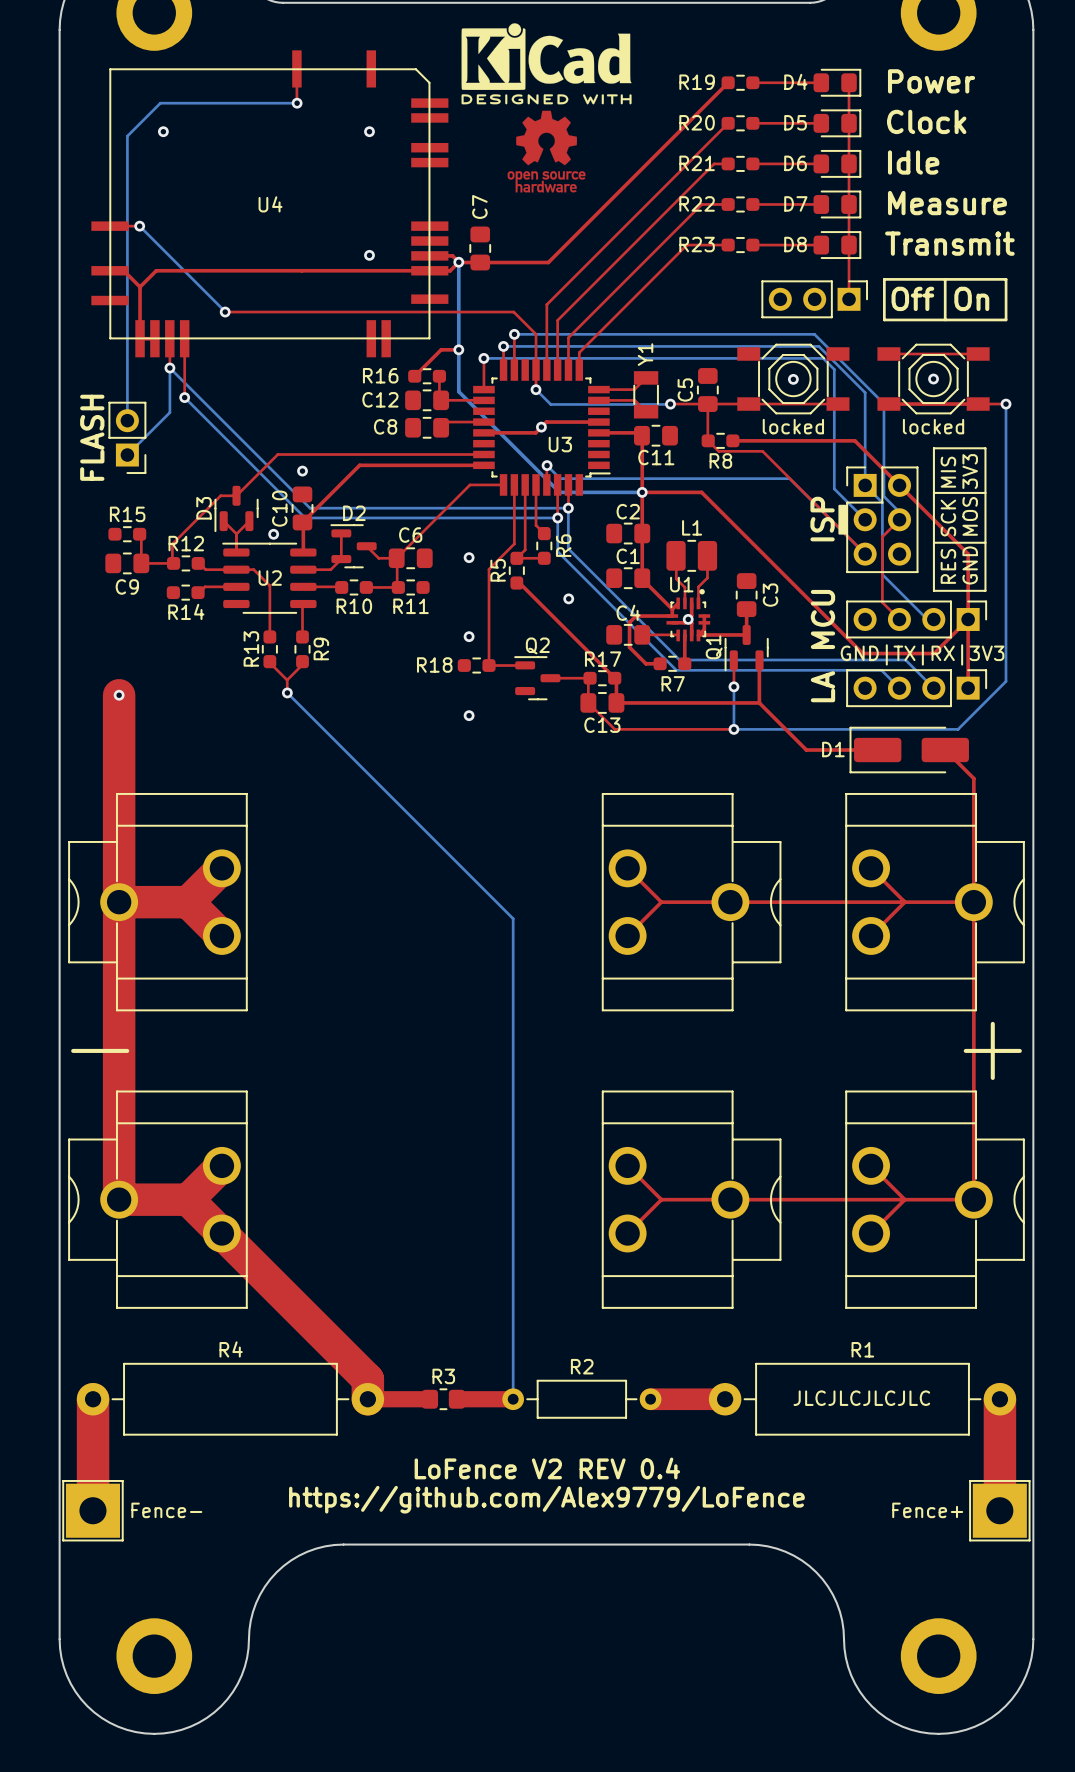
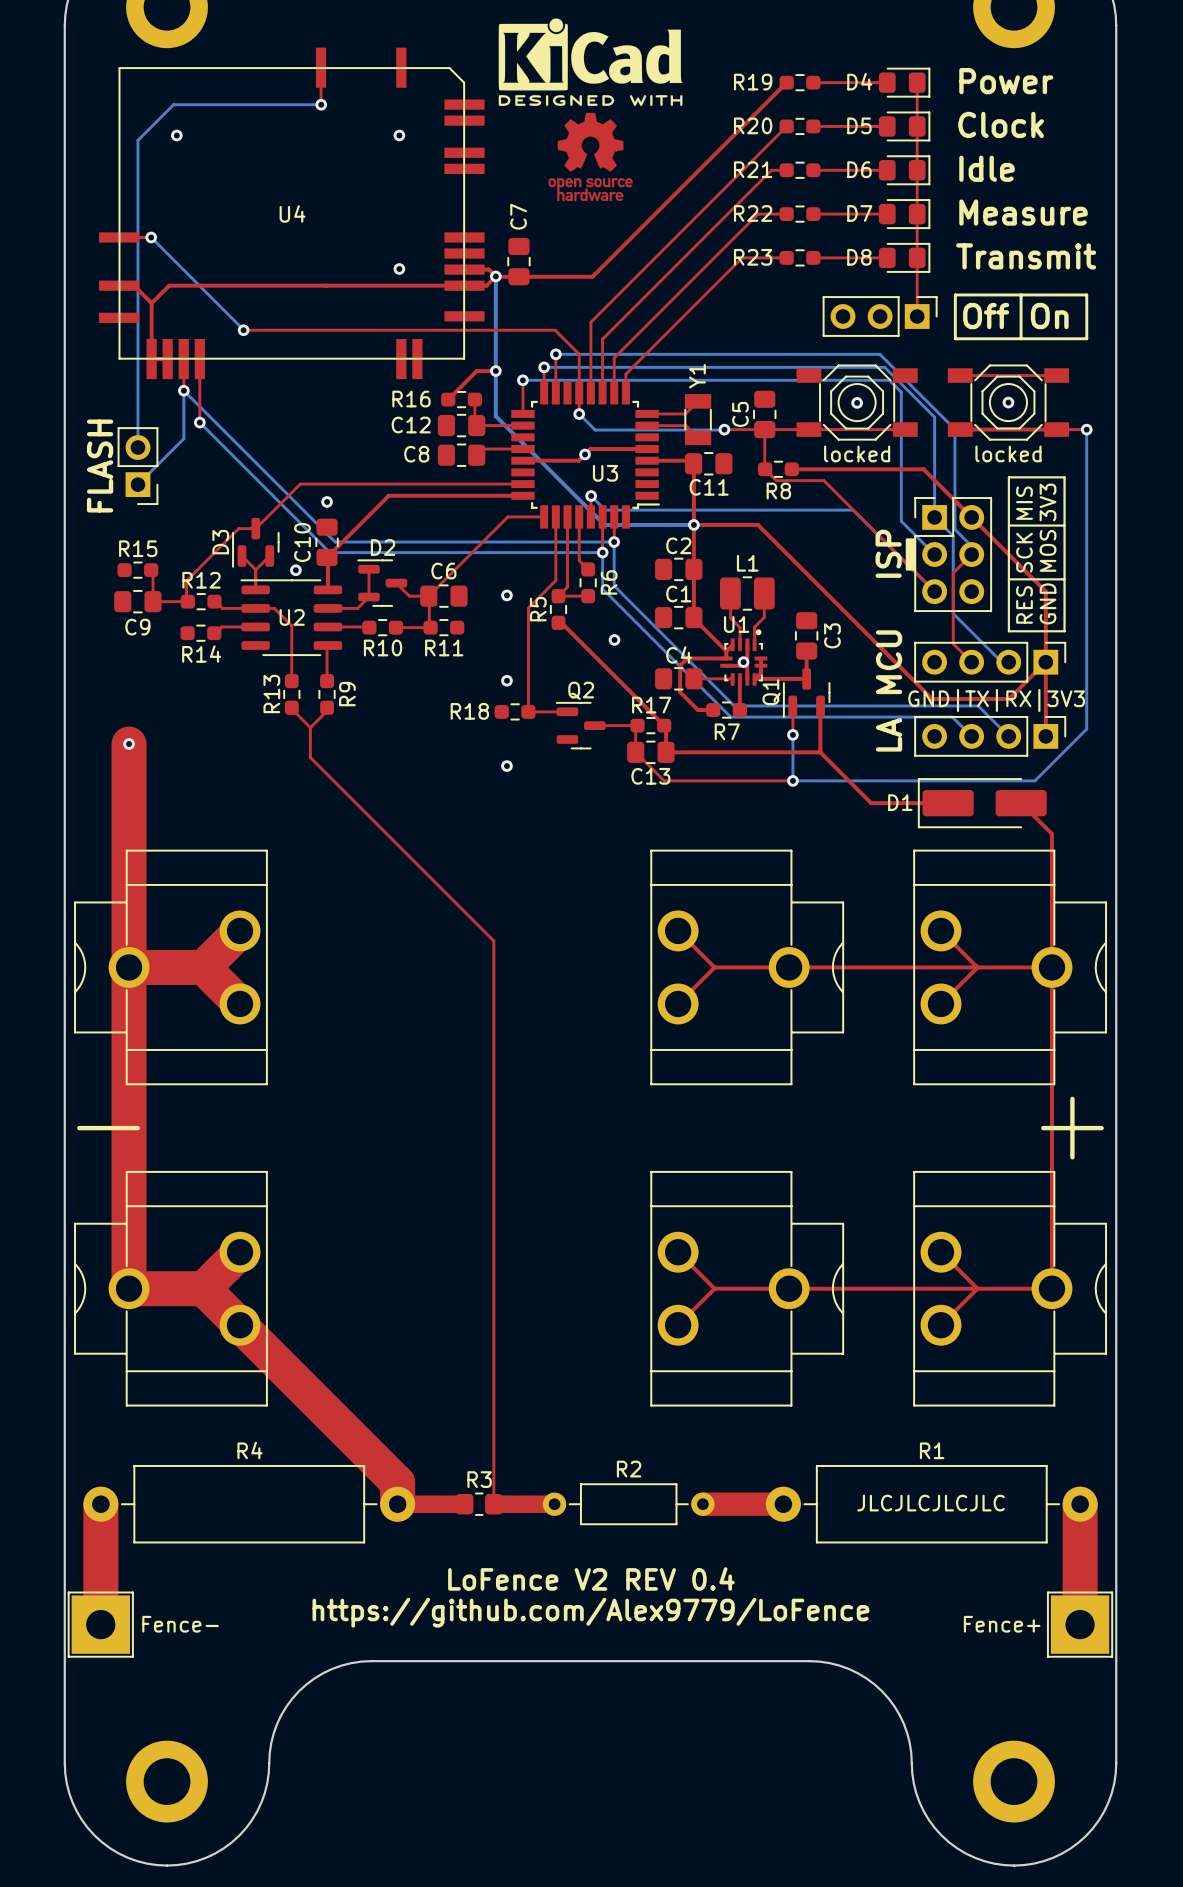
top track: (287, 679) (287, 692) -> (310, 727) (310, 757) (493, 940) (493, 1504)
bottom track: (287, 692) (513, 918) (513, 1399) -> none
via: (287, 692) -> none

